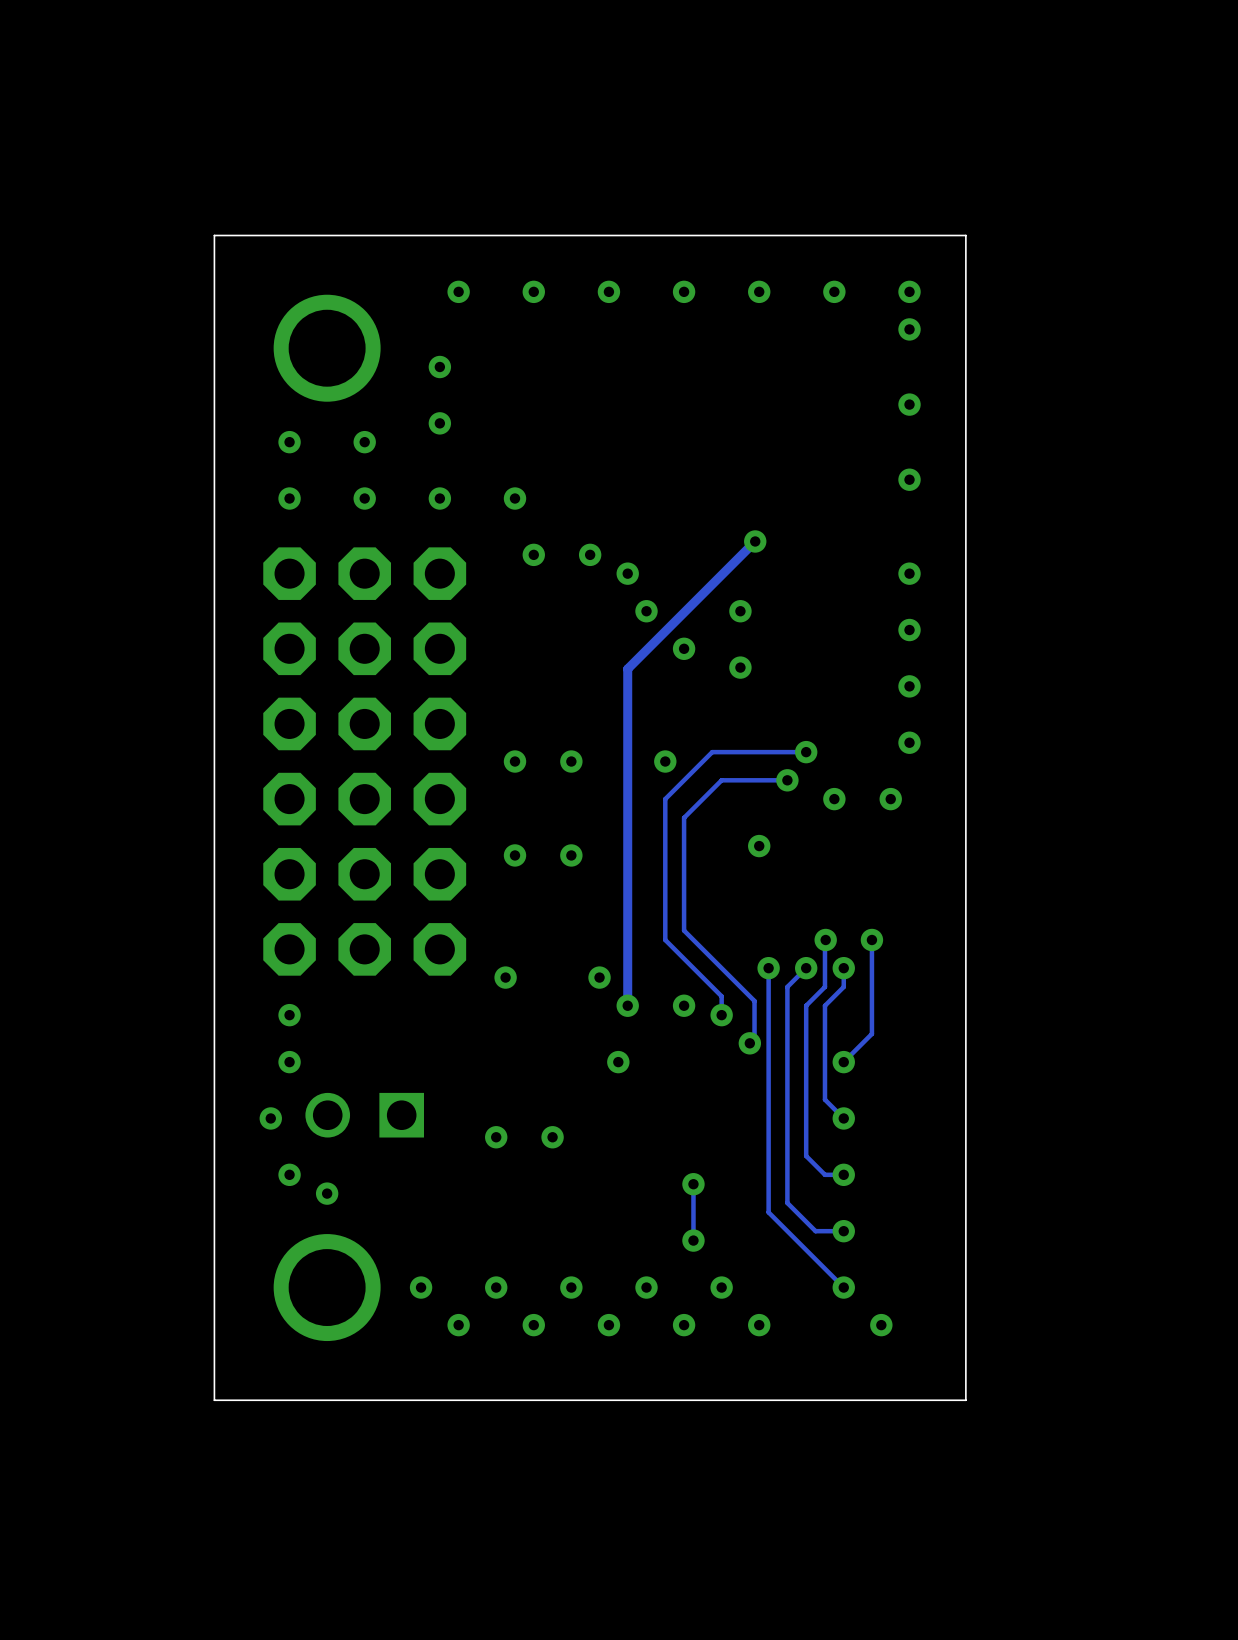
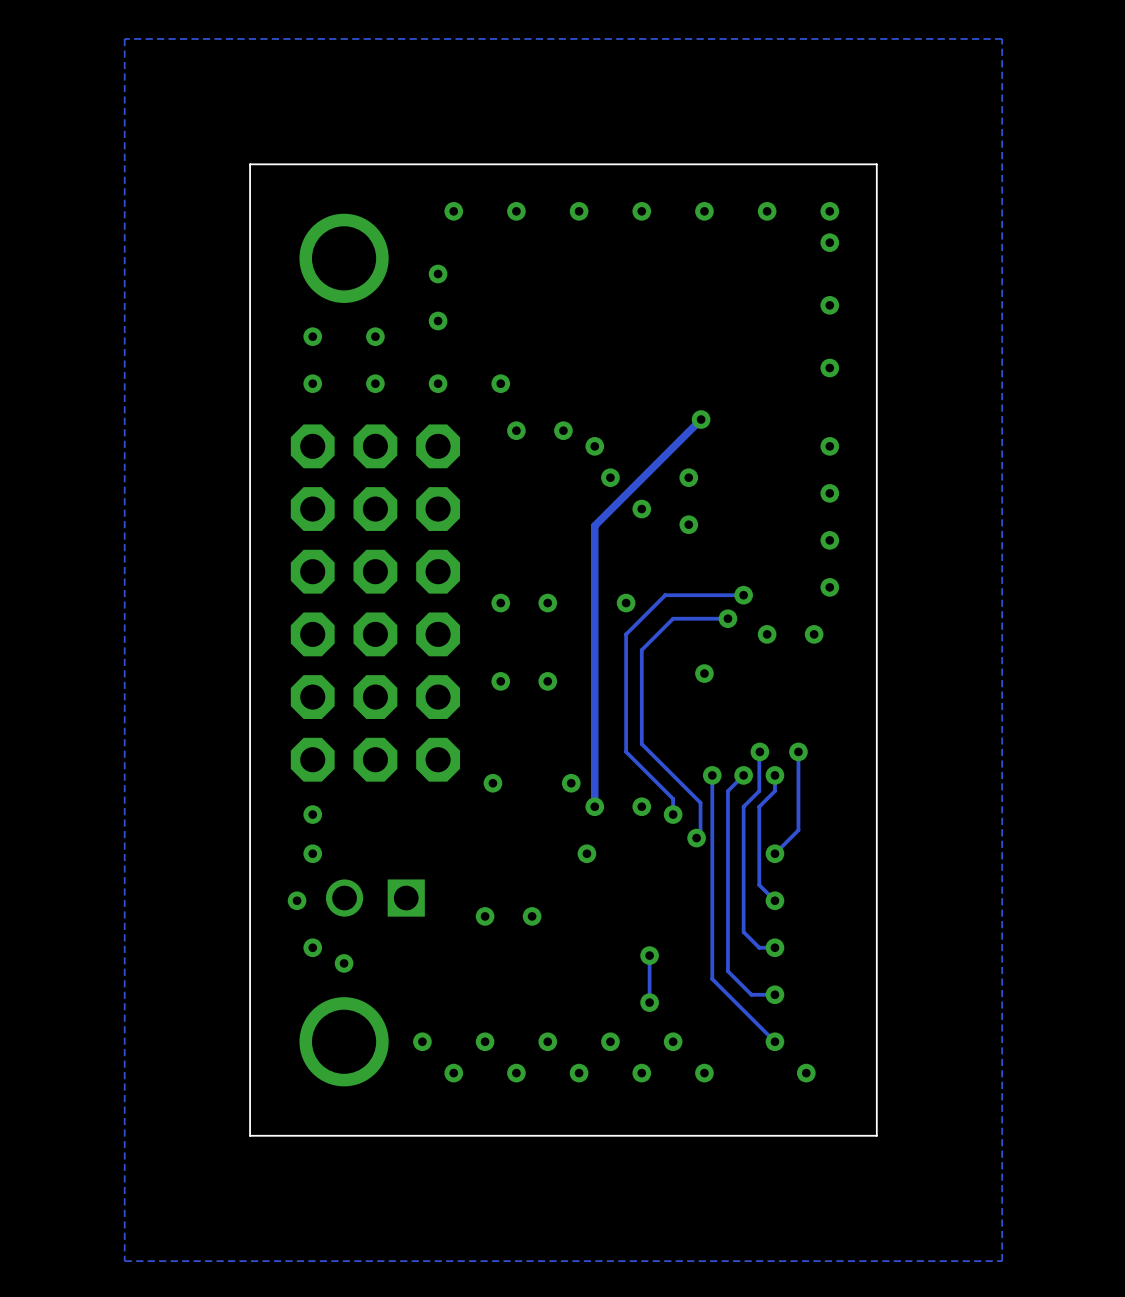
zone outline: none -> (1002, 38) (124, 38) (124, 1261) (1002, 1261) (1002, 38)

